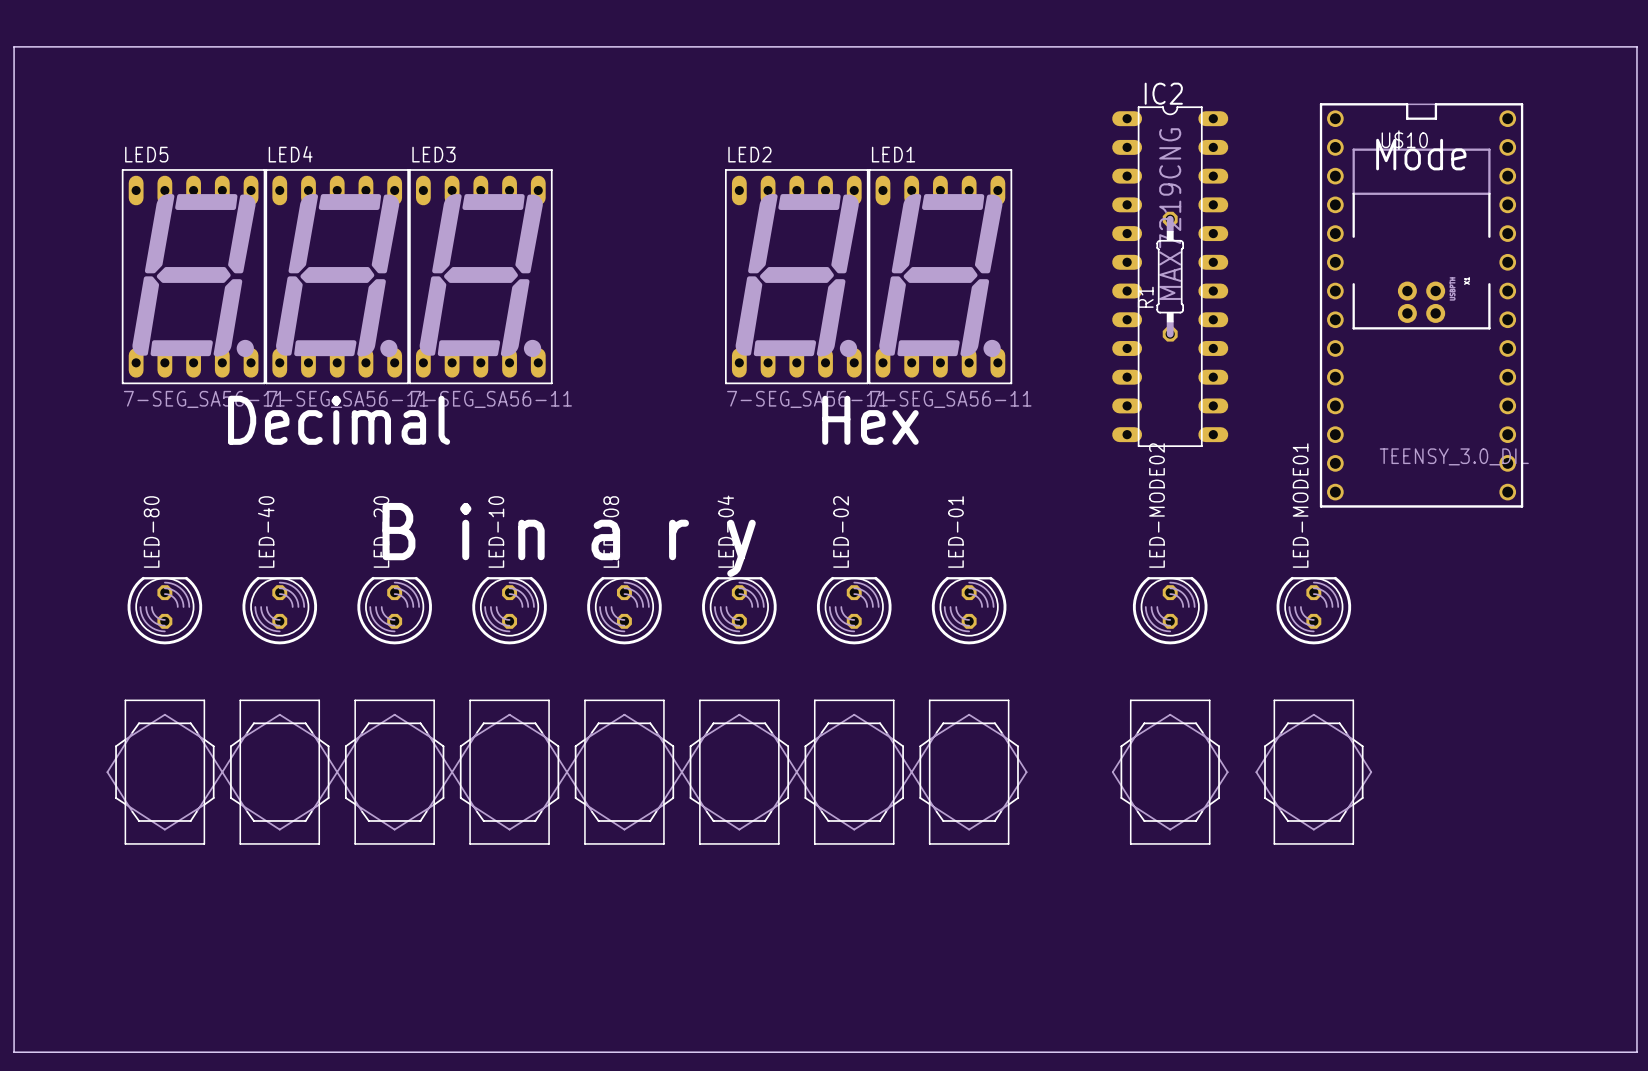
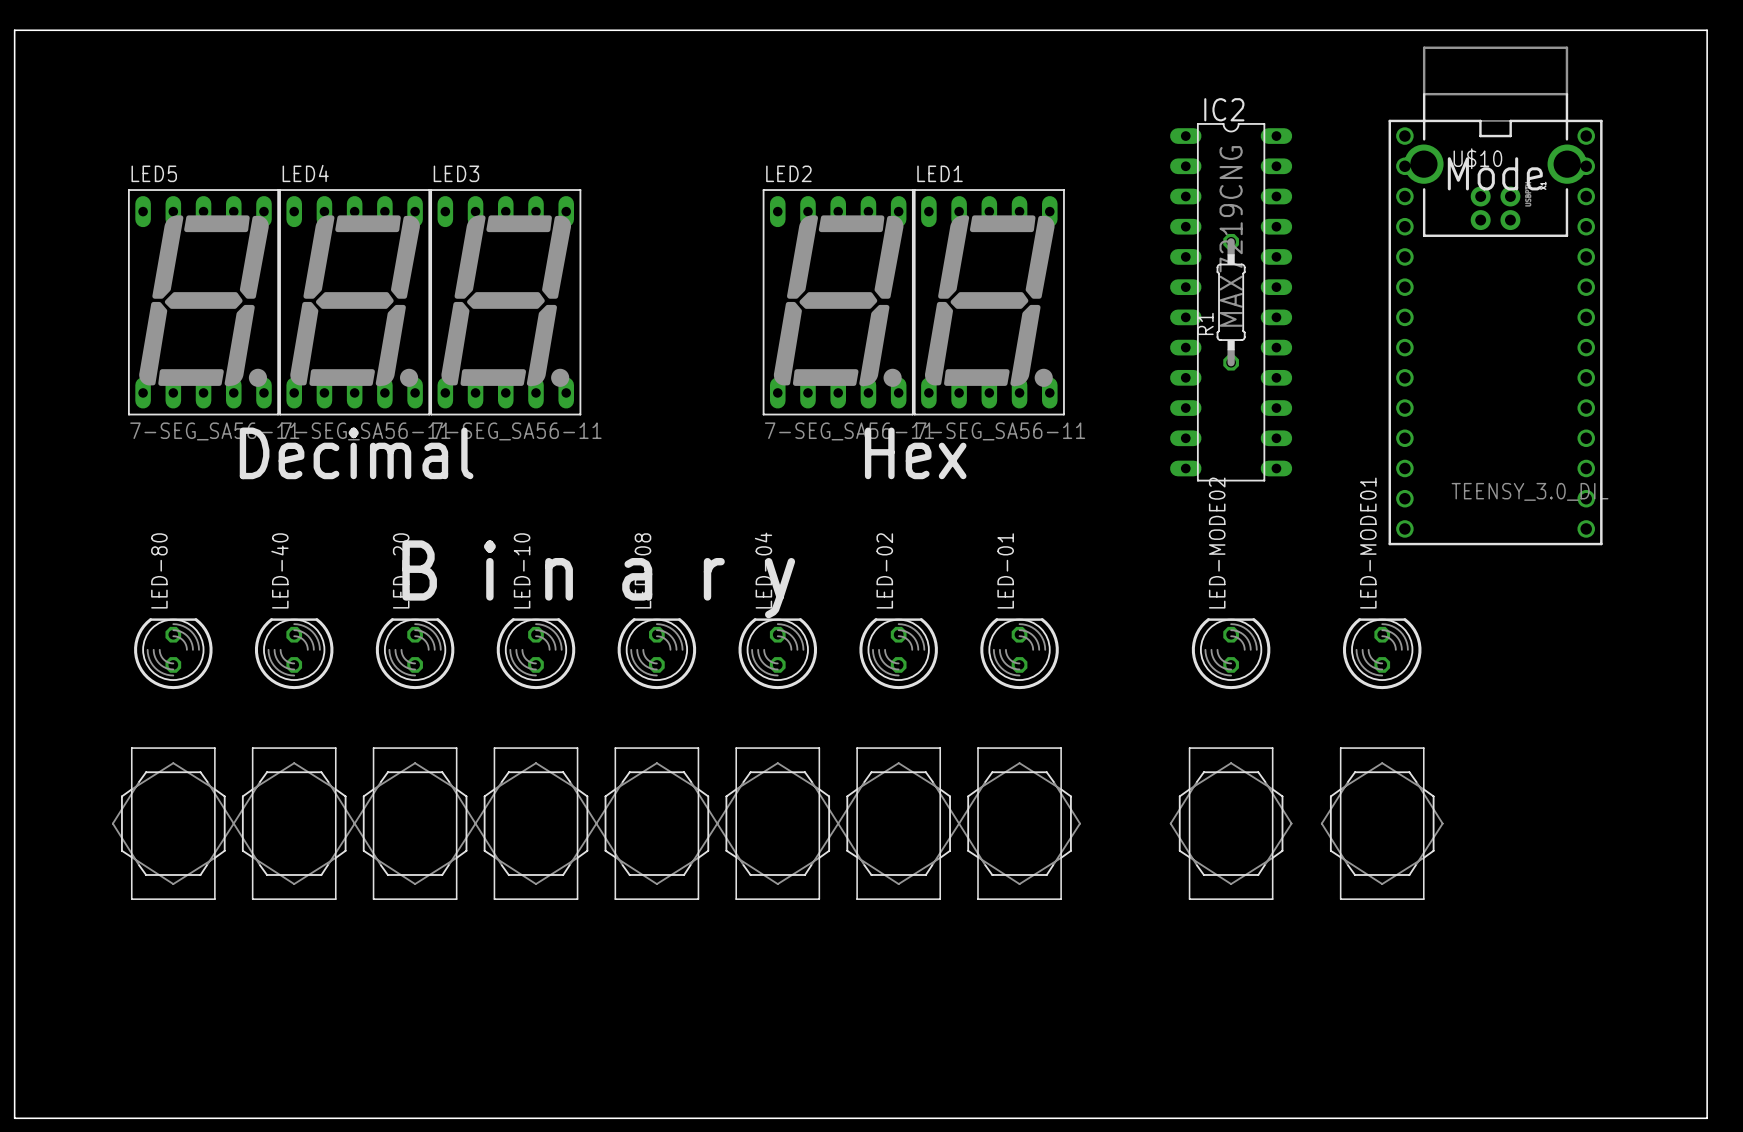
board edge: (14, 46) (1636, 46) (1636, 1052) (1622, 1052) -> (14, 60) (14, 30) (1707, 30) (1707, 1118)
part footprint: [1352, 148, 1491, 330] -> [1404, 46, 1587, 237]

